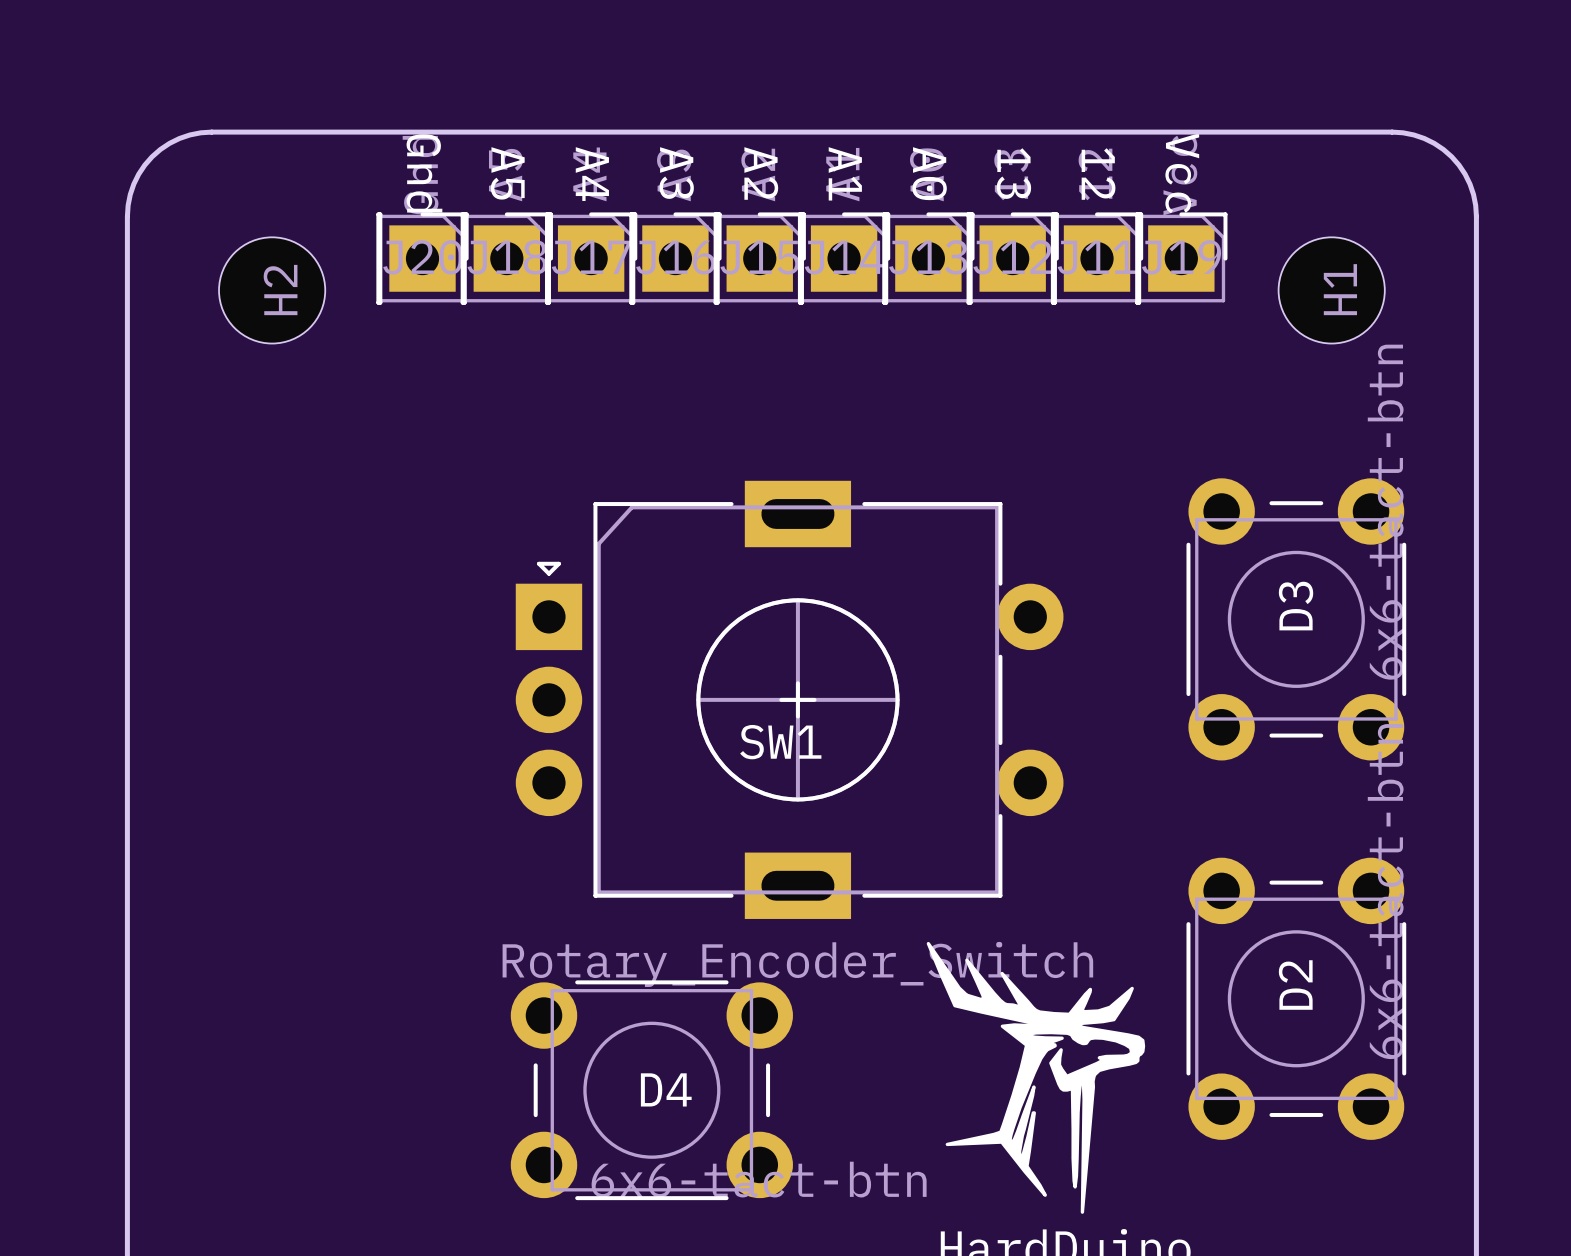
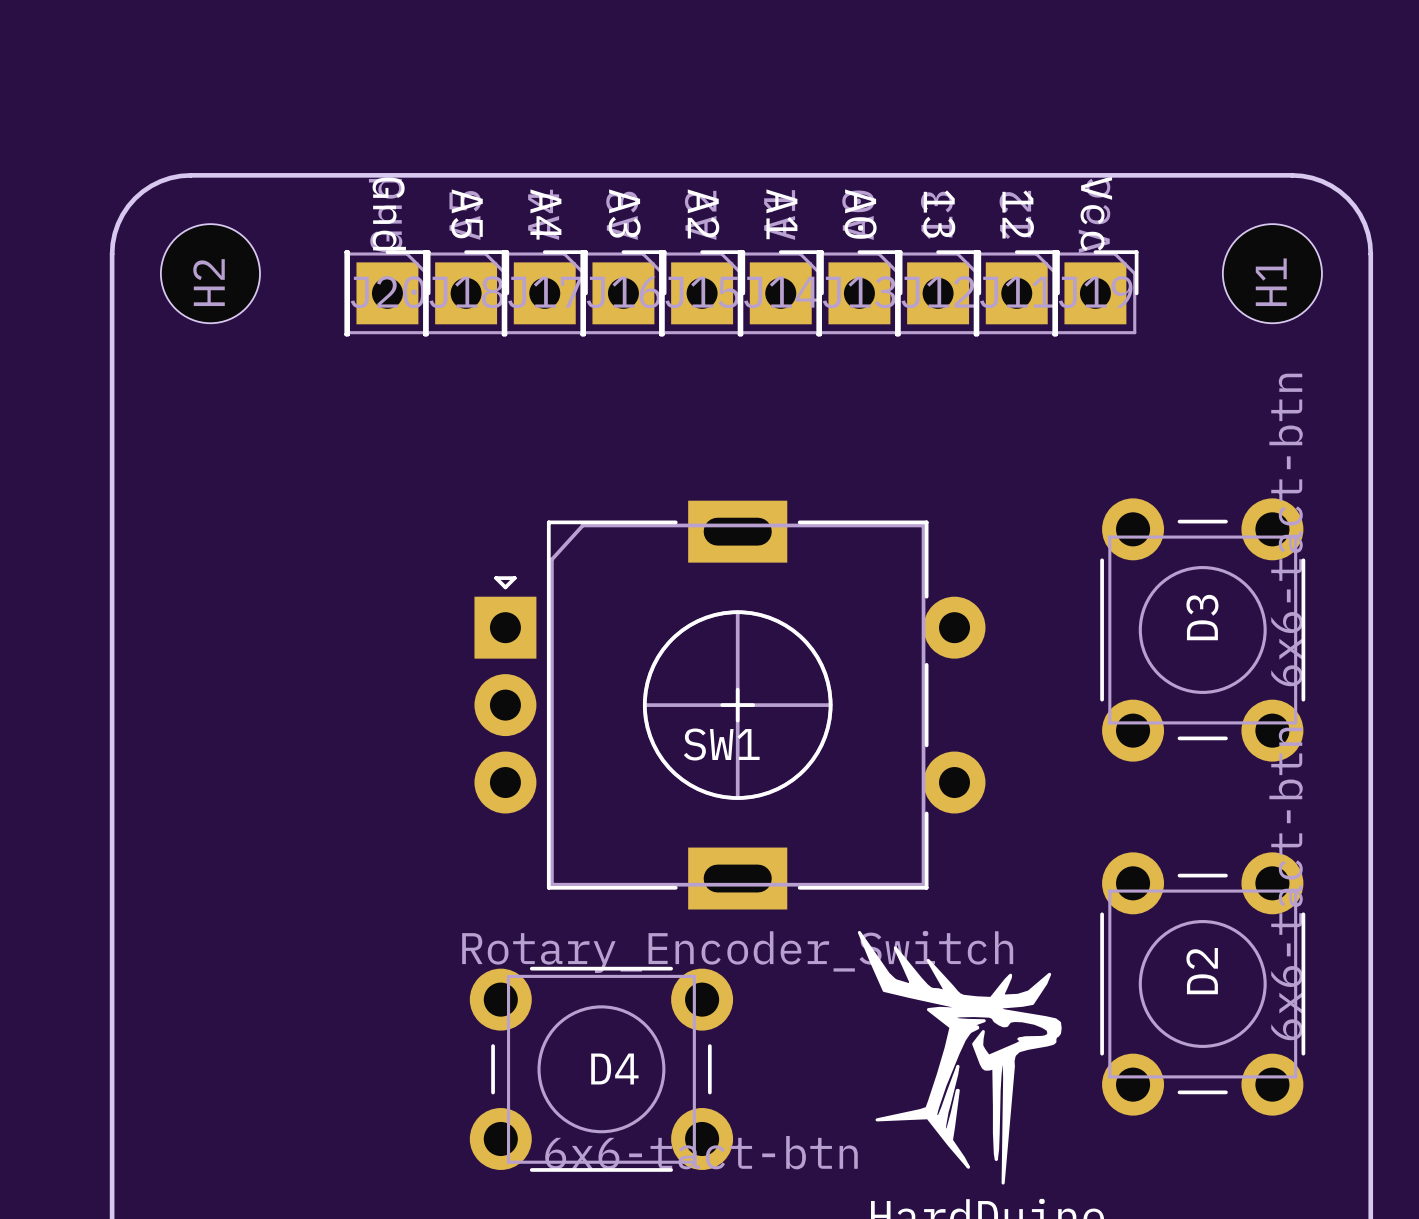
H1 name position: H1 (1340, 289) -> H1 (1271, 282)
H2 position: (272, 290) -> (210, 273)
H2 name position: H2 (280, 290) -> H2 (209, 282)
H1 position: (1331, 290) -> (1272, 273)

